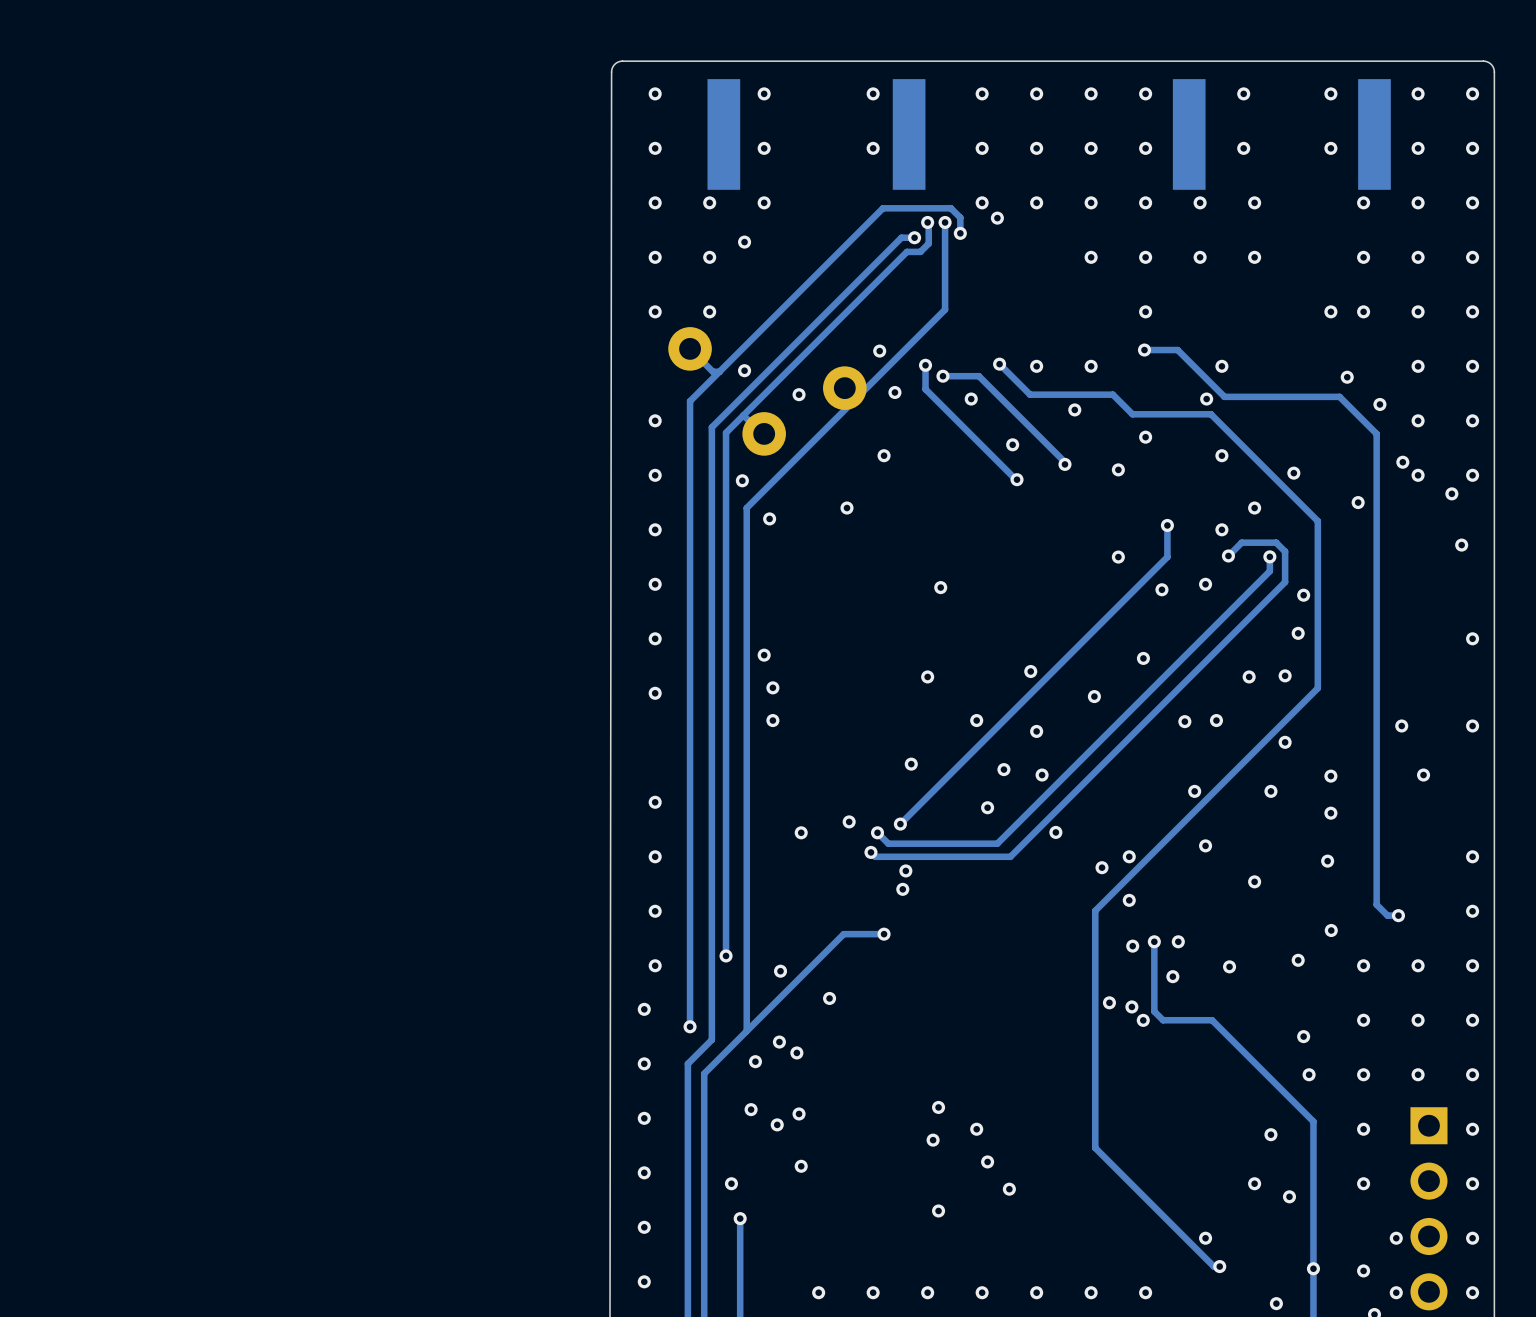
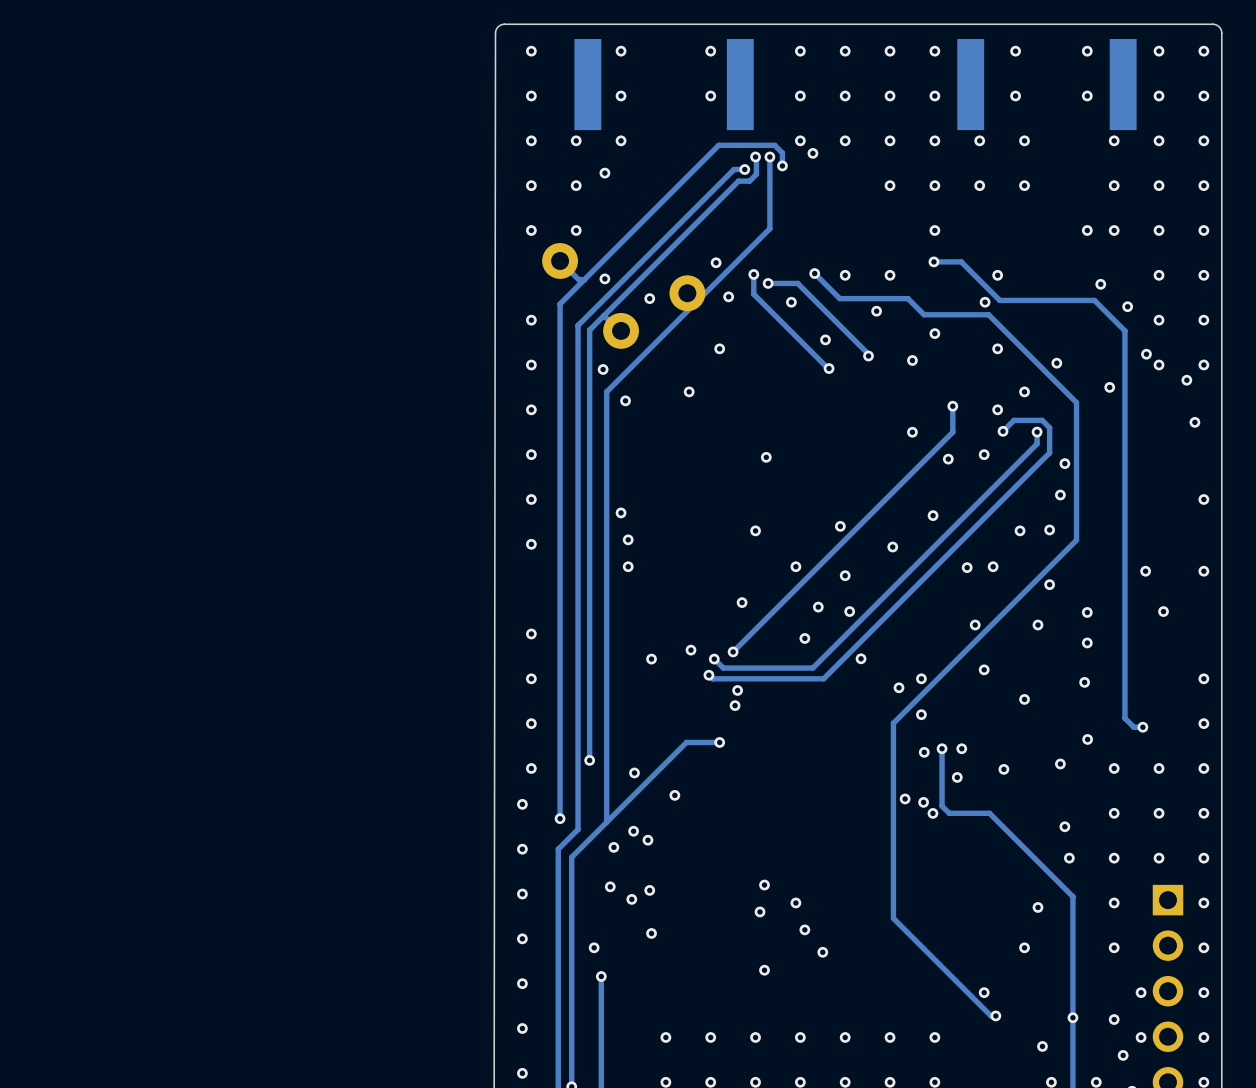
via: (1289, 1196) -> none

